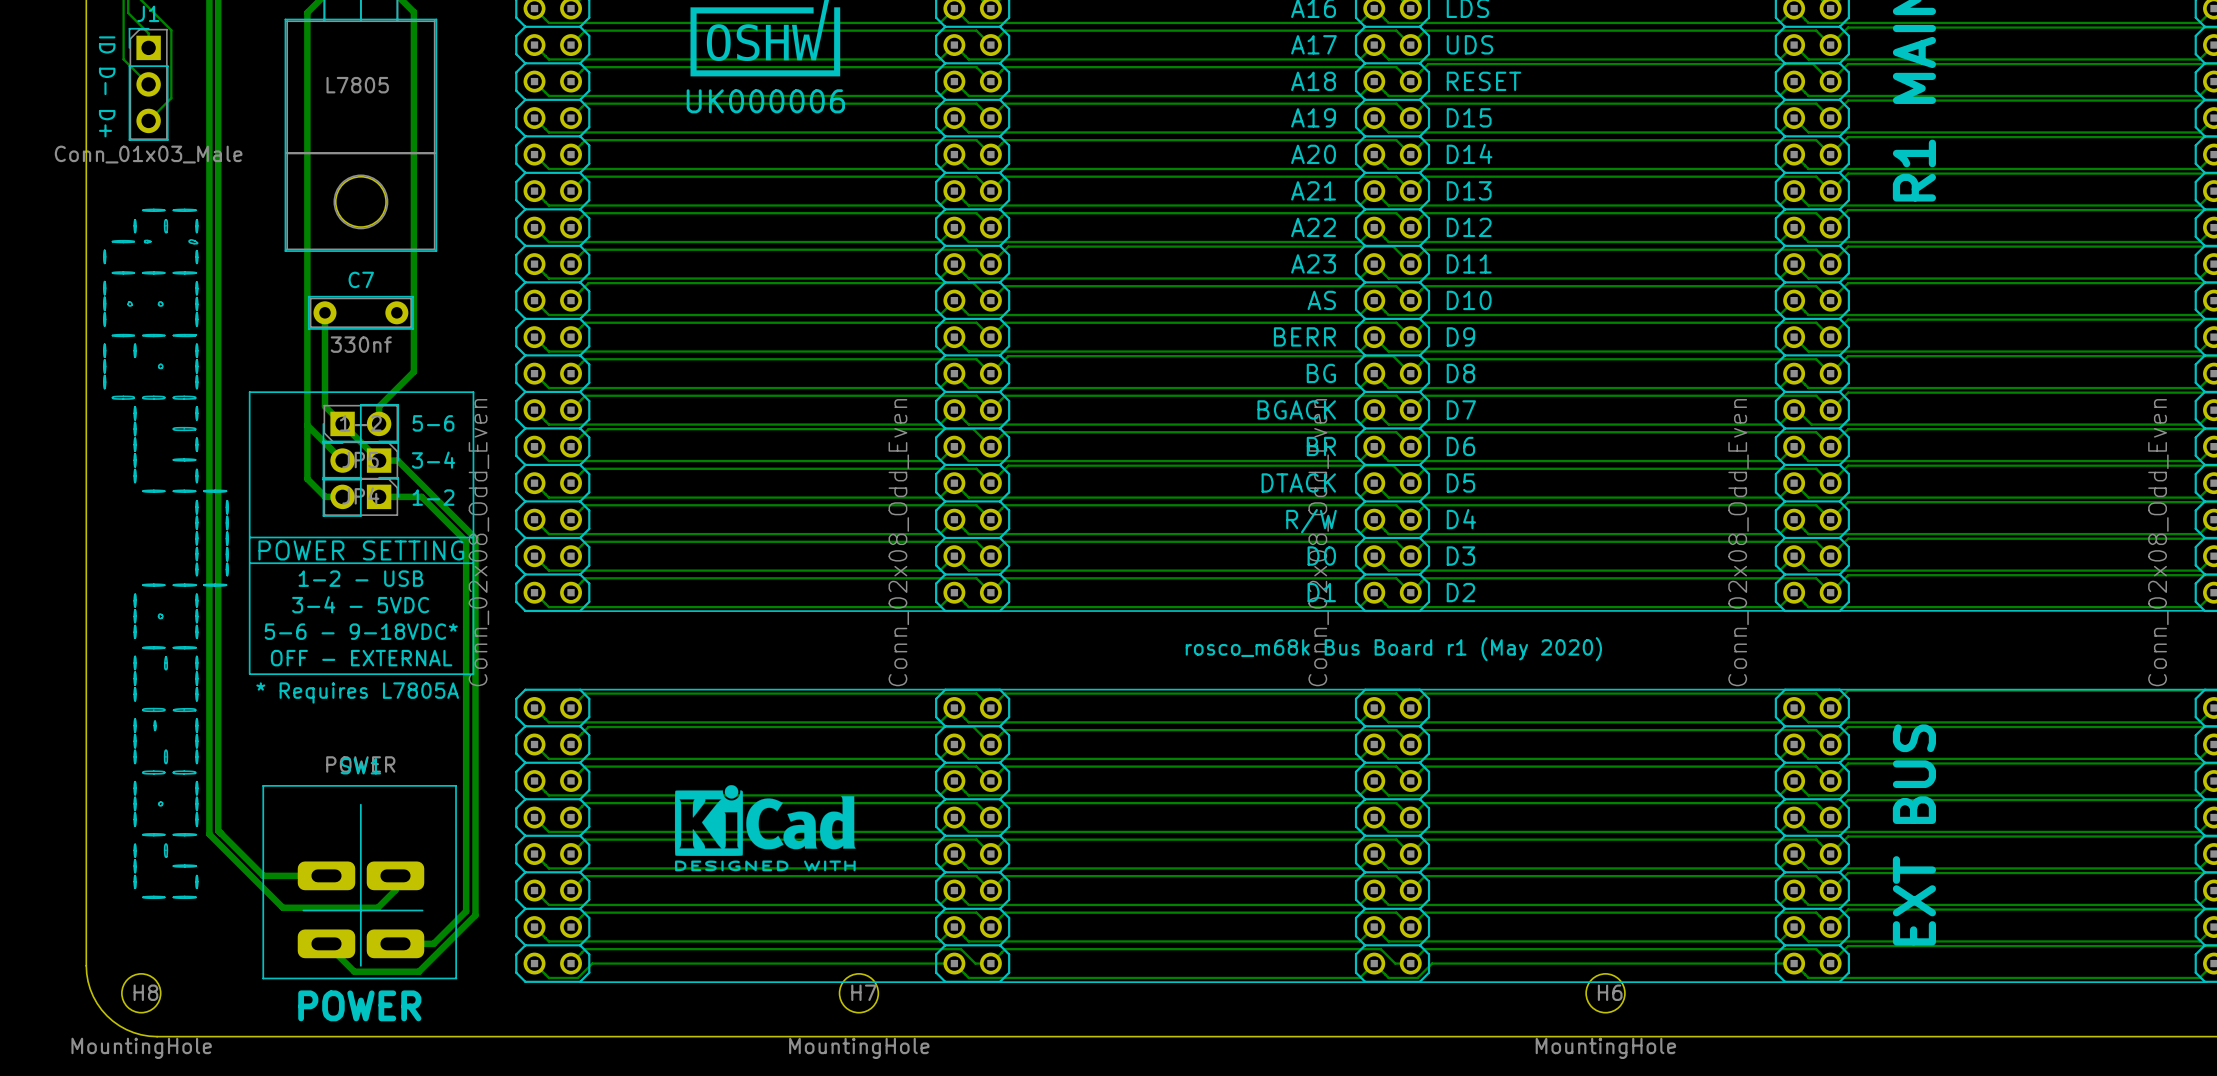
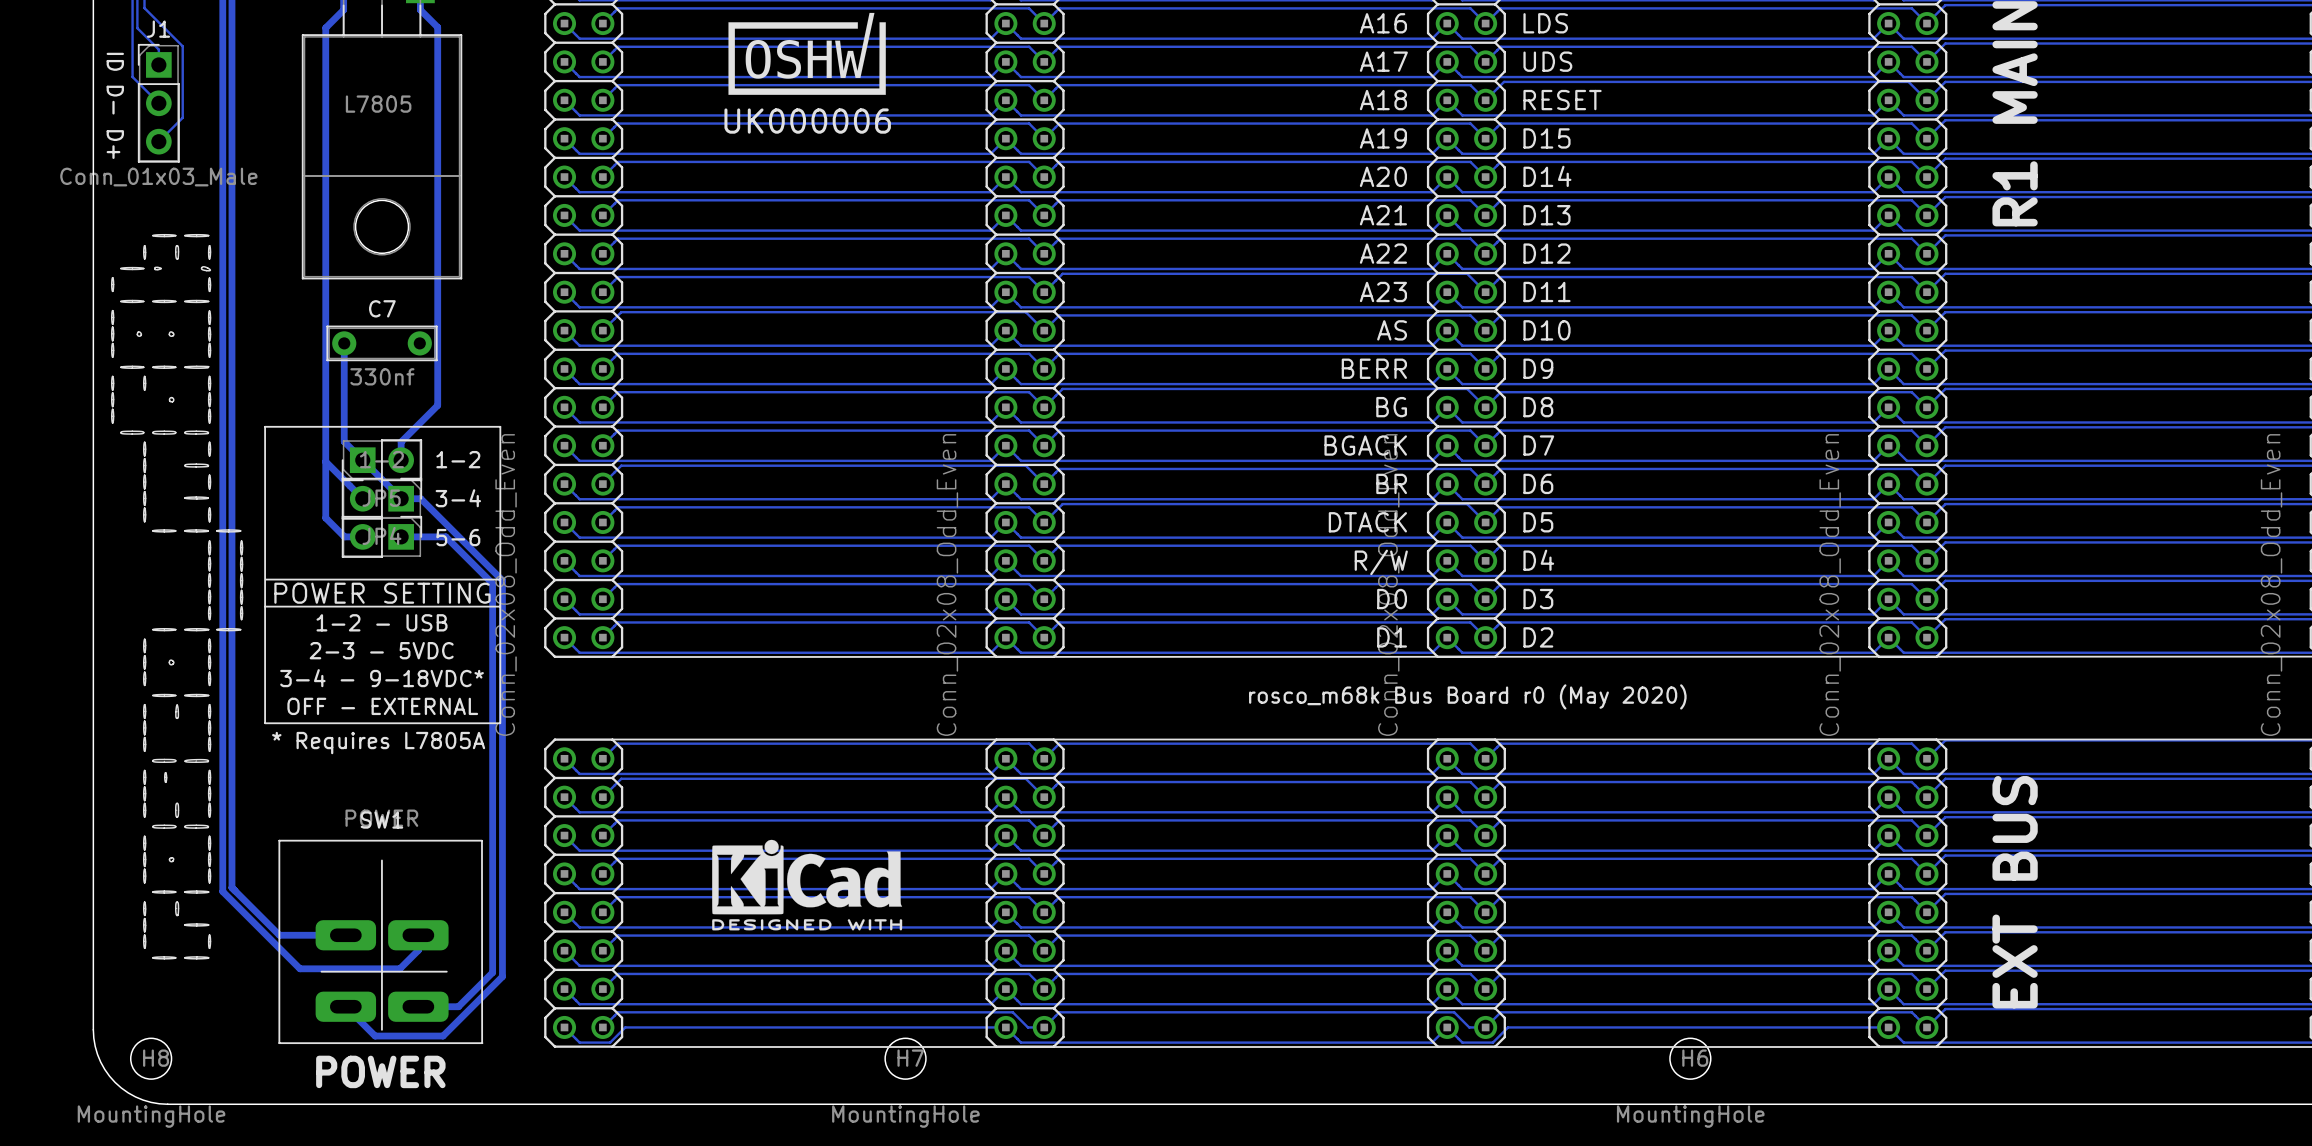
text: 5-6 (433, 423) -> 1-2 (458, 459)
text: 1-2 (433, 497) -> 5-6 (458, 537)
text: 3-4 - 5VDC (360, 604) -> 2-3 - 5VDC (381, 650)
text: 5-6 - 9-18VDC* (361, 631) -> 3-4 - 9-18VDC* (382, 678)
text: rosco_m68k Bus Board r1 (May 2020) (1393, 649) -> rosco_m68k Bus Board r0 (May 2020) (1467, 696)

